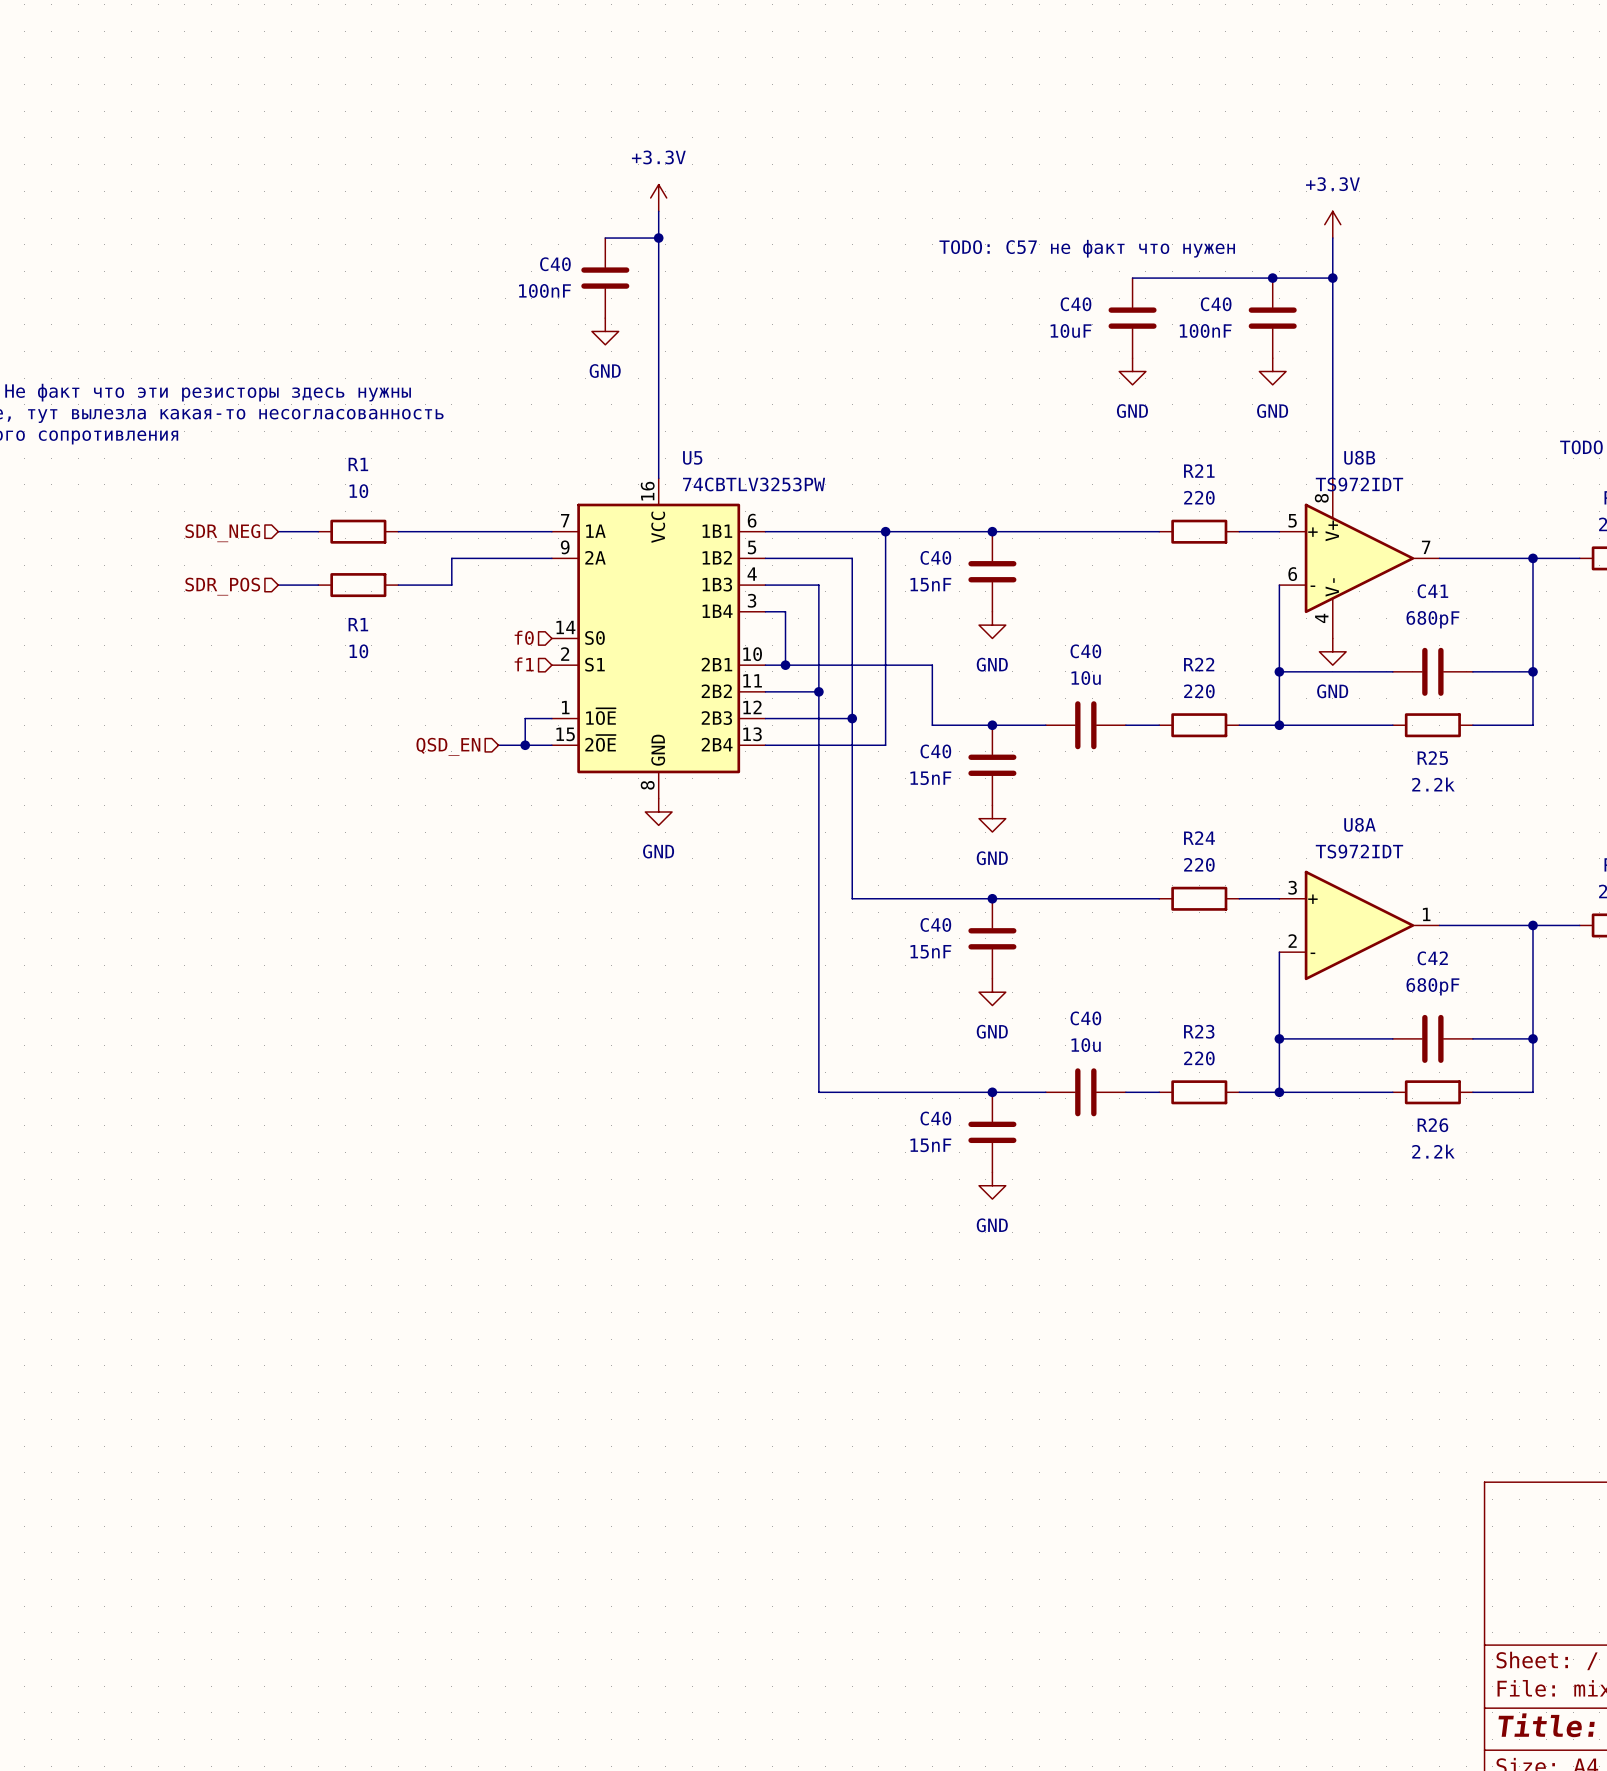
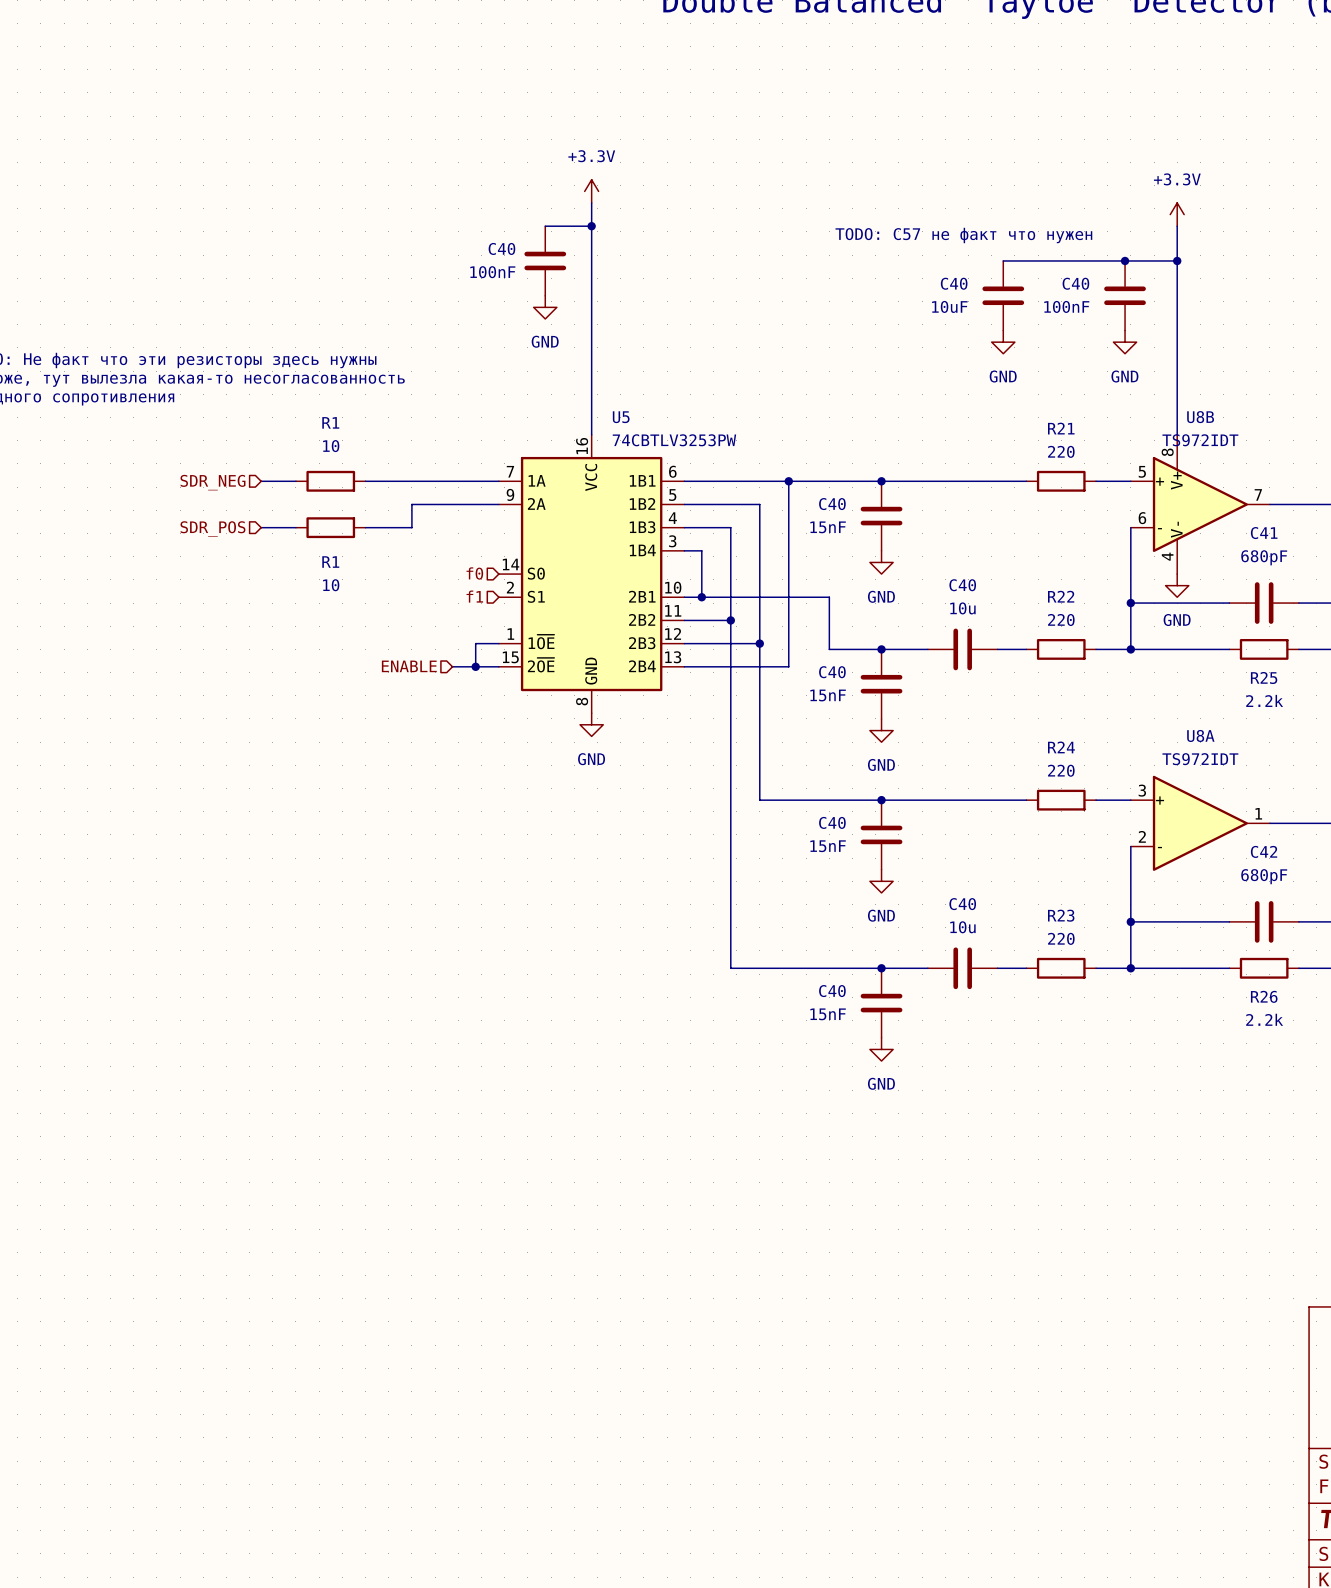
hierarchical label: QSD_EN (448, 746) -> ENABLE (409, 666)

